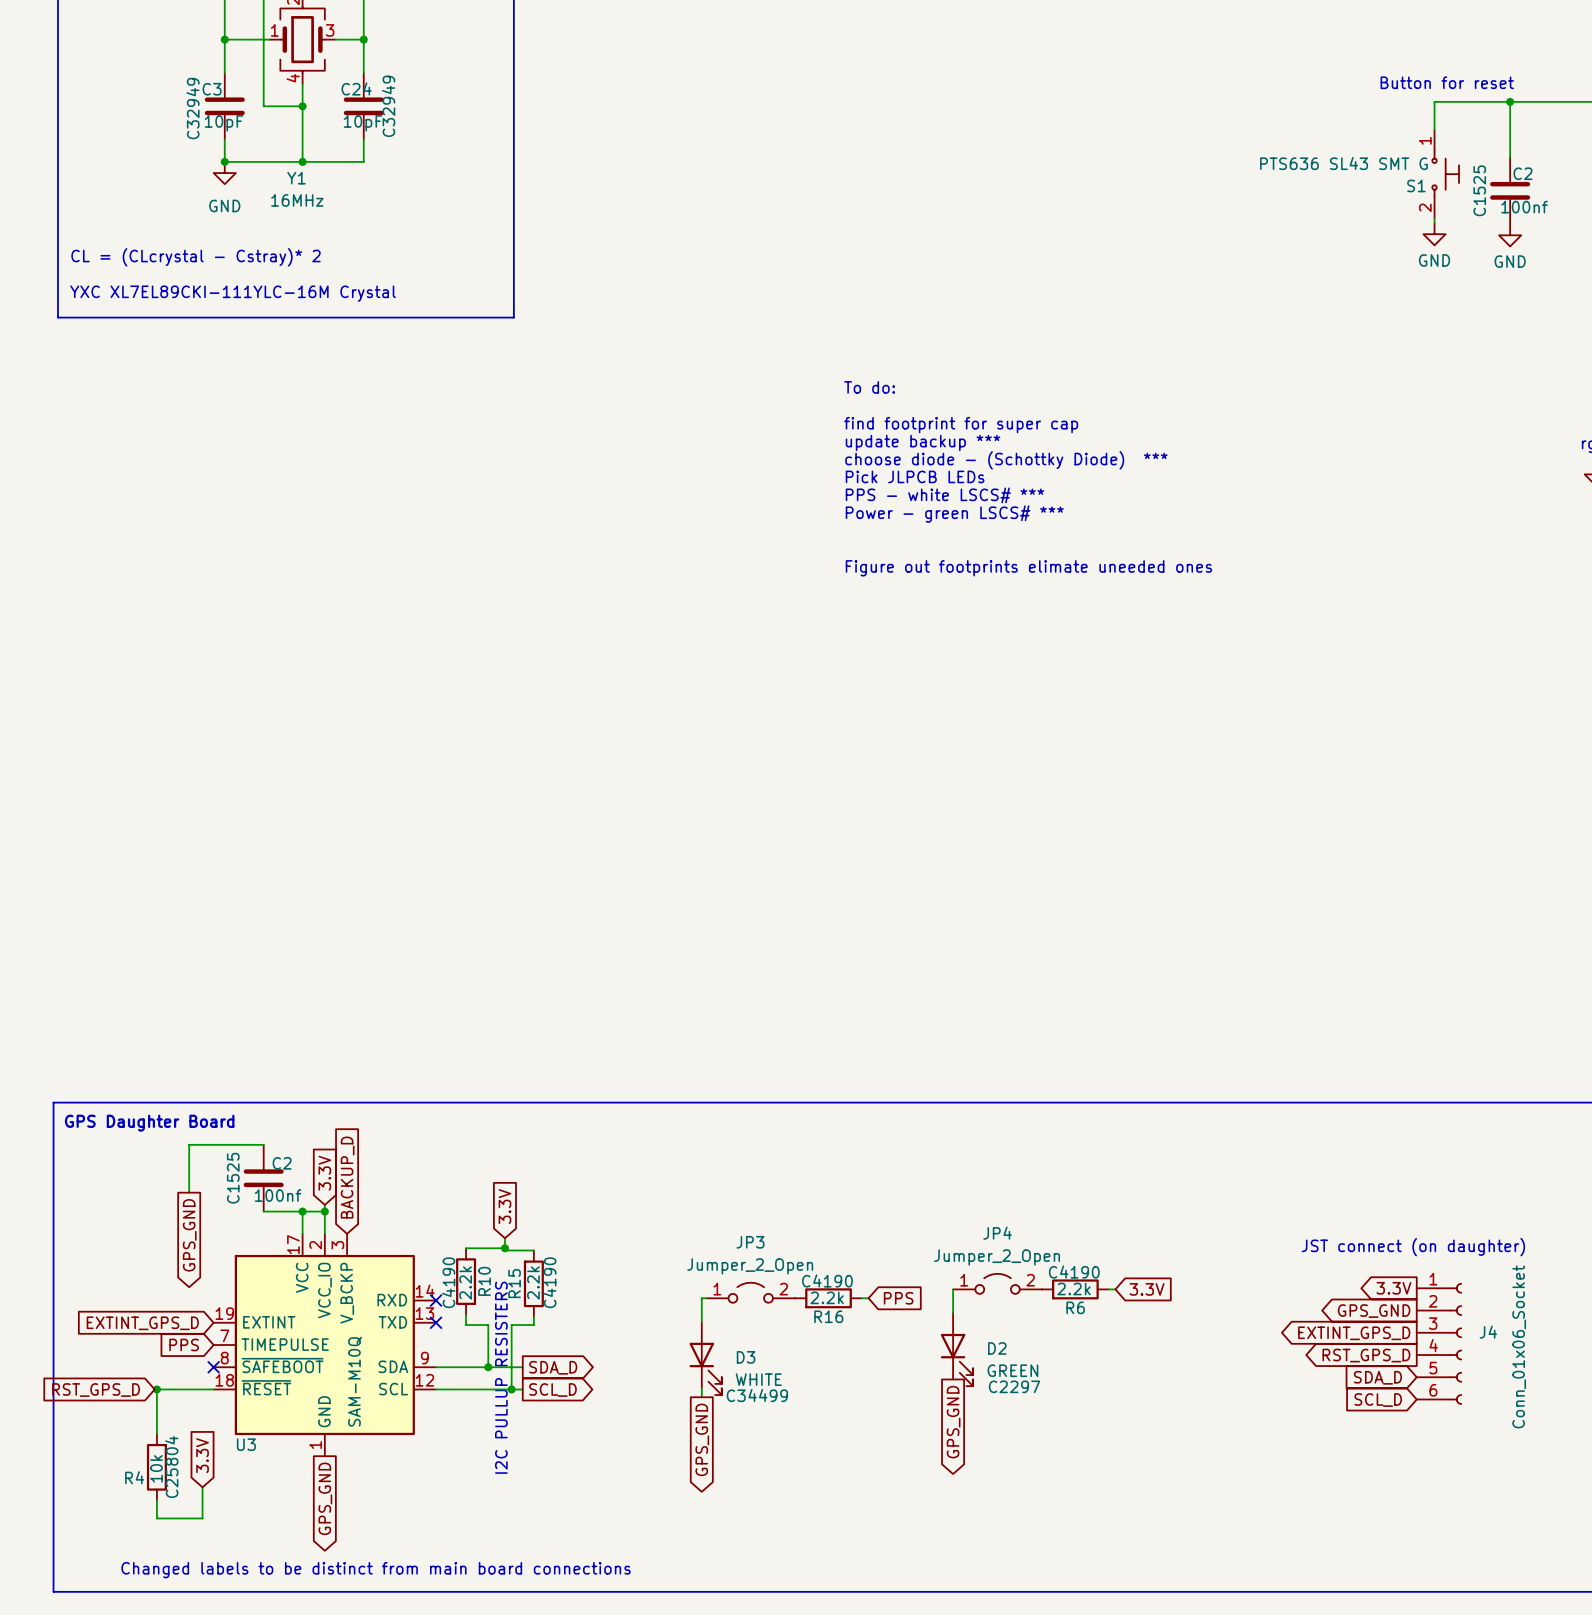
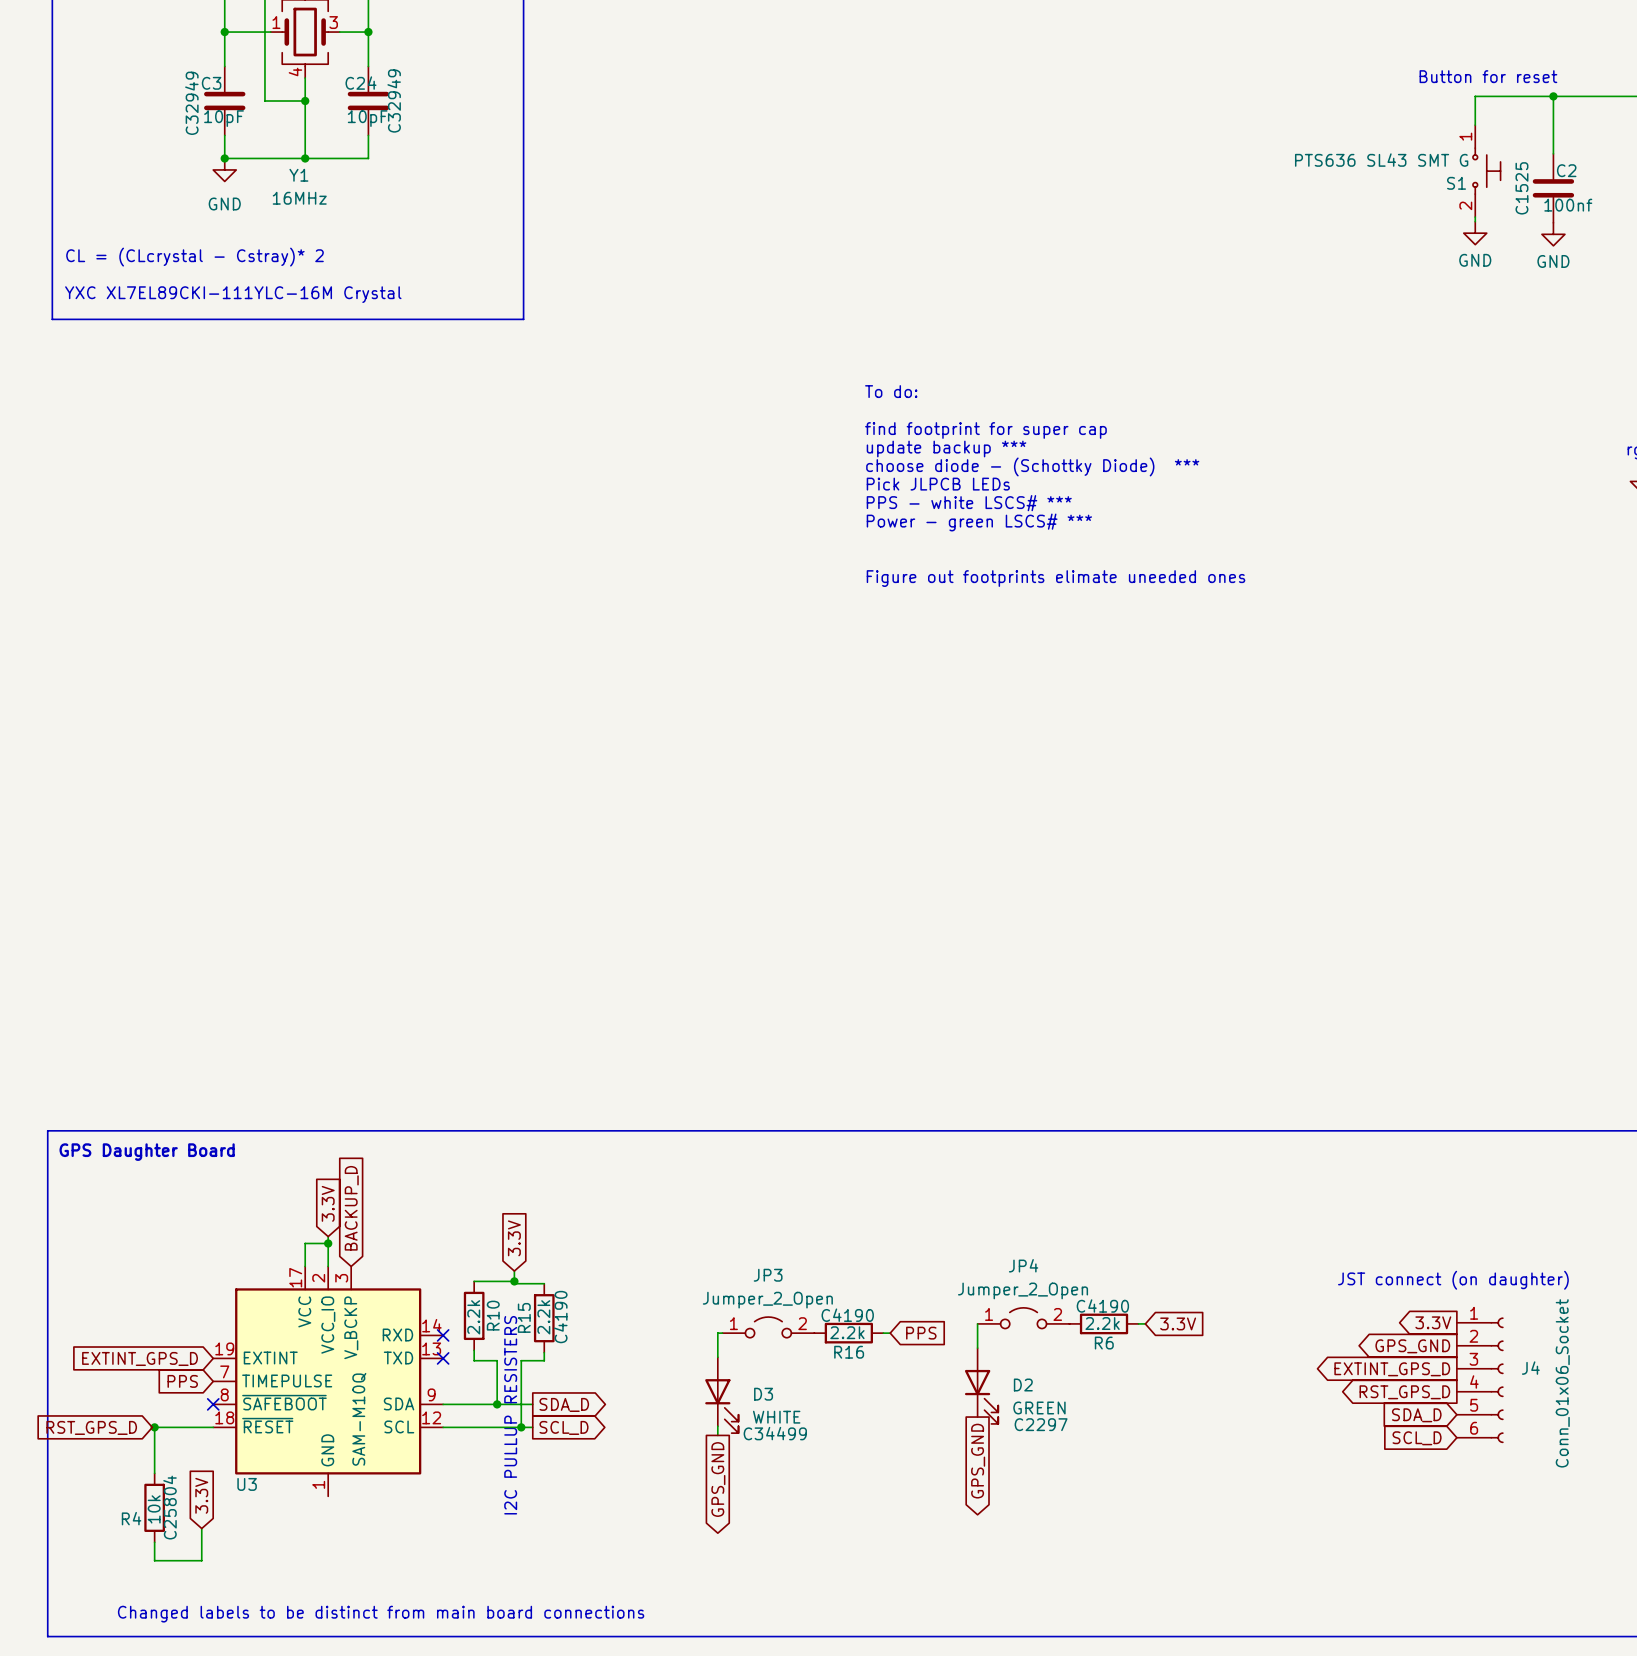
wire: (263, 1144) (189, 1144) (189, 1192) -> none
C2: 100nf (263, 1178) -> none
wire: (263, 1211) (302, 1211) -> none
junction: (302, 1211) -> none
global label: GPS_GND (189, 1235) -> none
R10 text: C4190 (448, 1282) -> none
global label: GPS_GND (325, 1498) -> none

